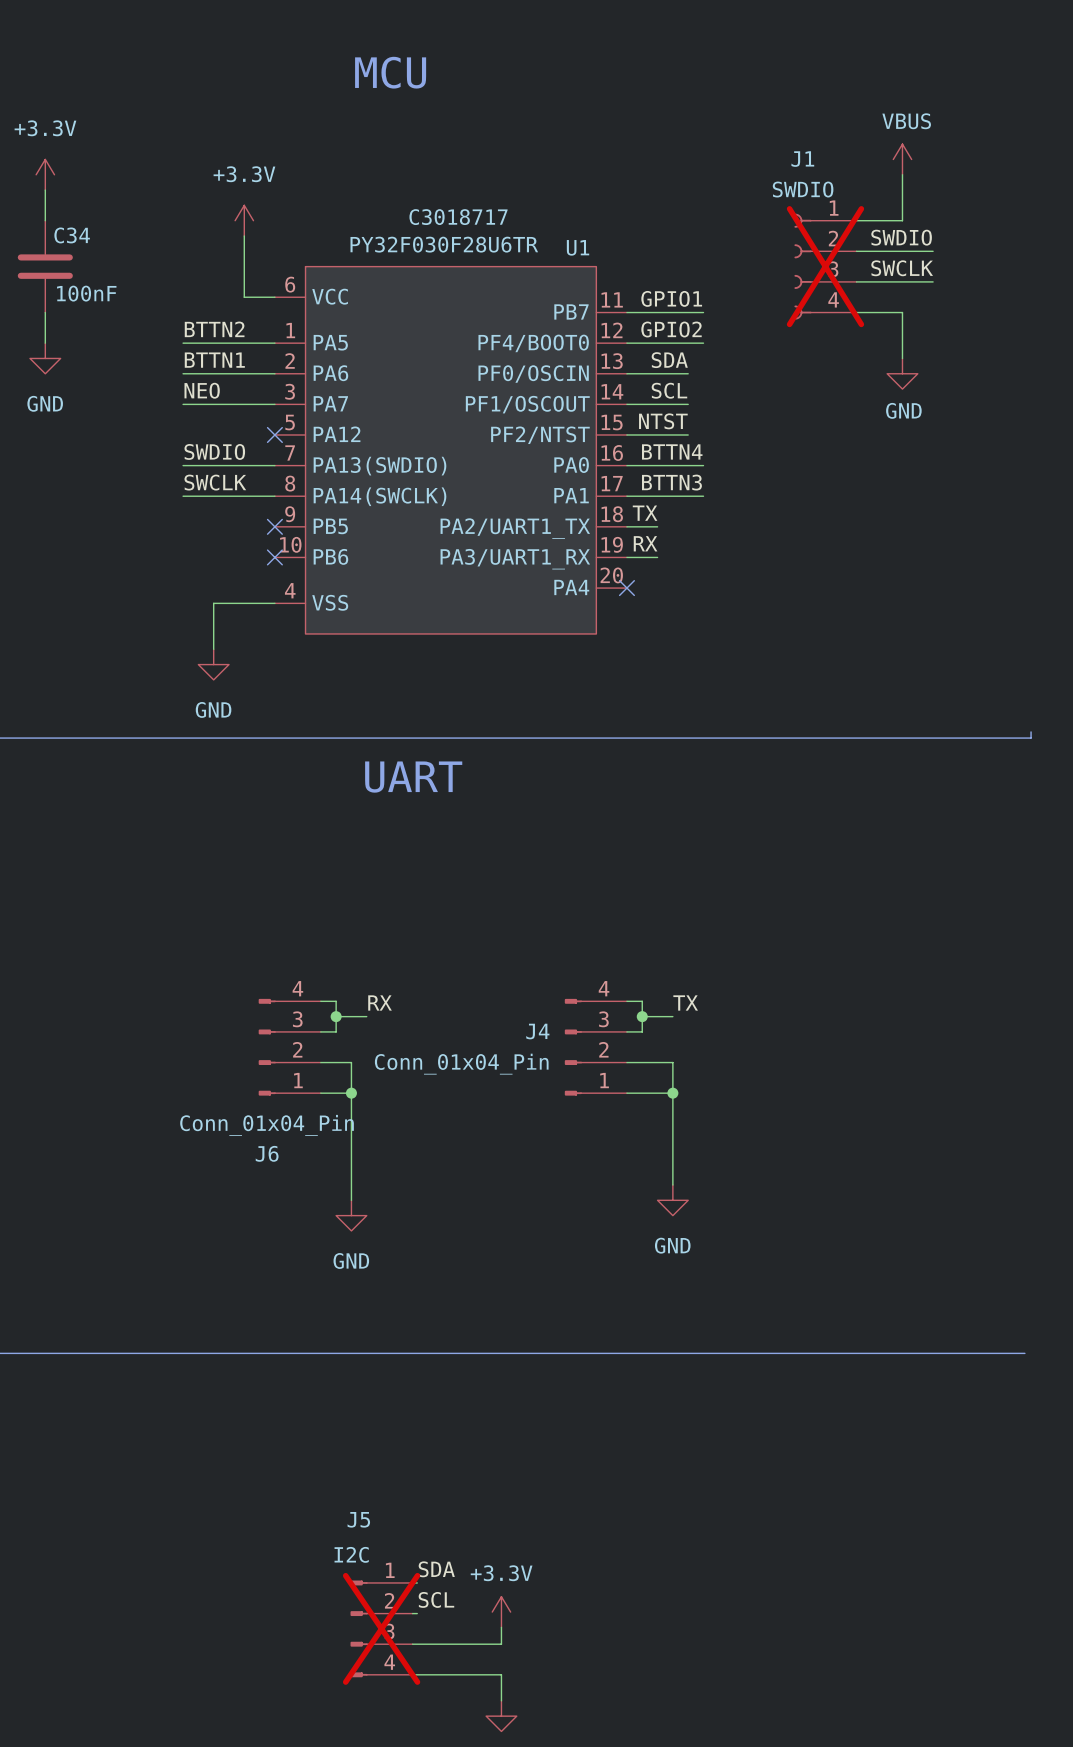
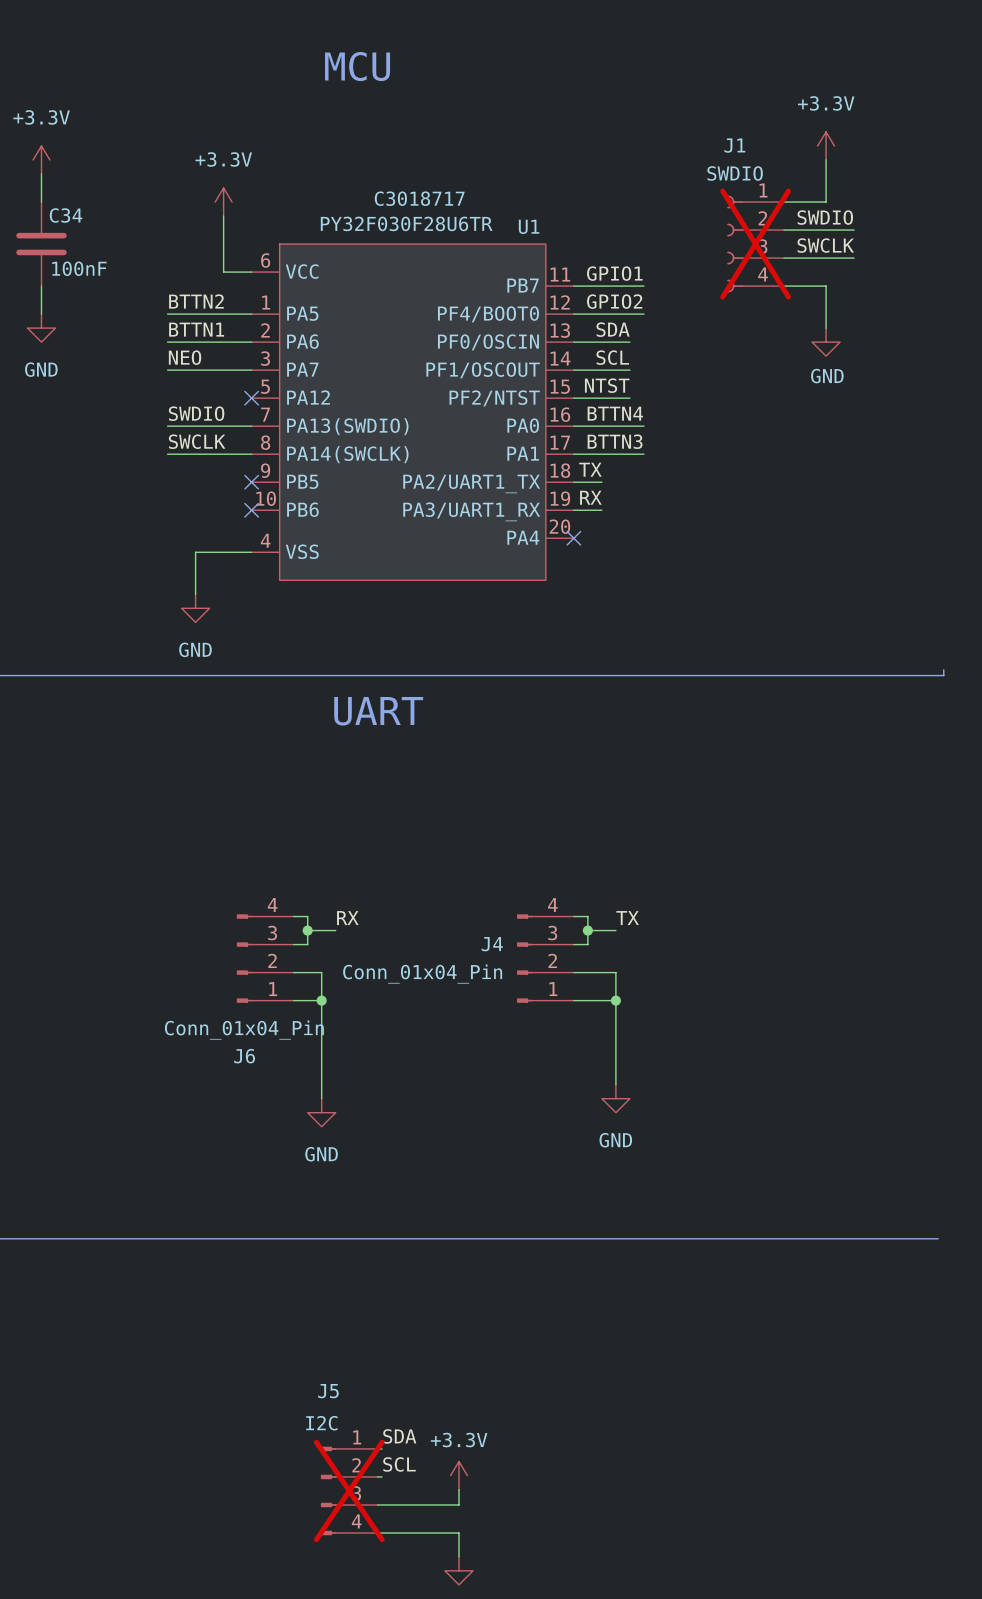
power symbol: VBUS (902, 159) -> +3.3V (826, 145)

